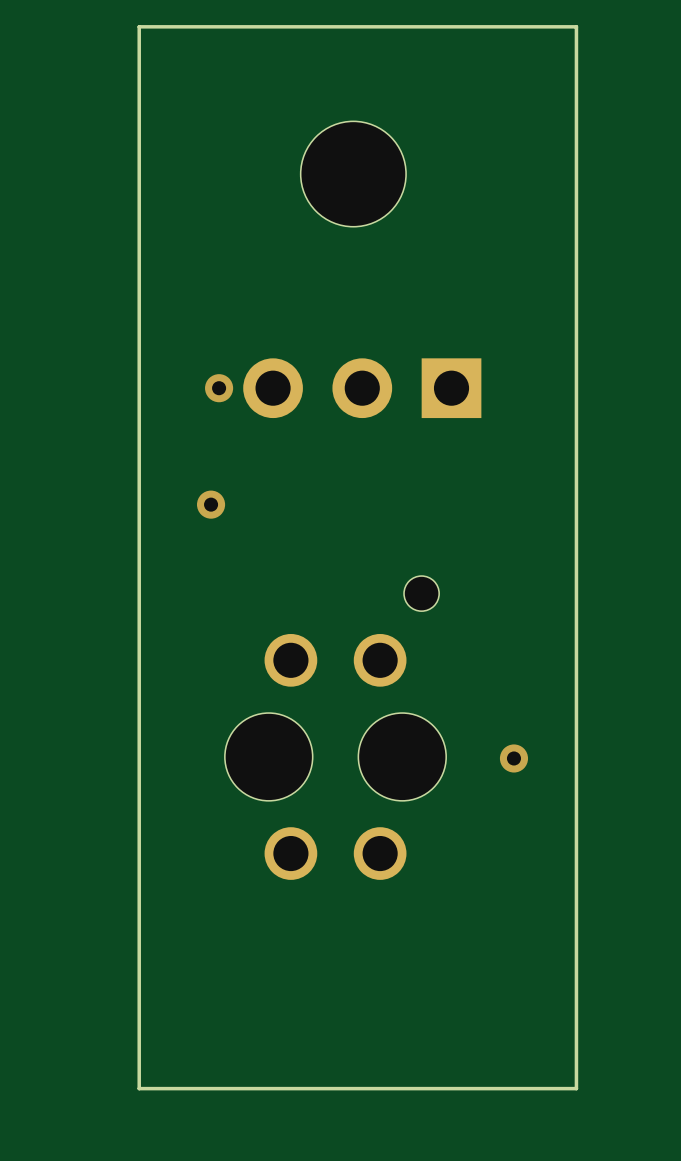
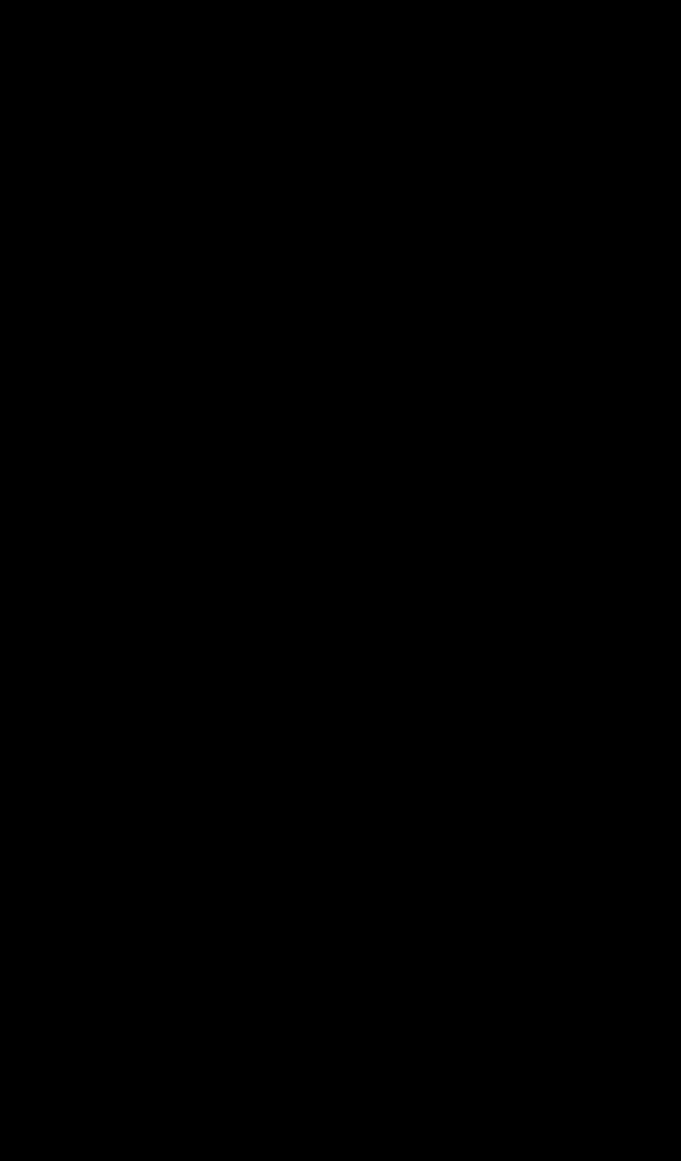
board edge: (576, 26) (139, 26) (139, 1088) (576, 1088) (576, 26) -> none
part: (353, 174) -> none
via: (219, 388) -> none
part: (362, 388) -> none
via: (211, 504) -> none
part: (335, 727) -> none
via: (513, 758) -> none

